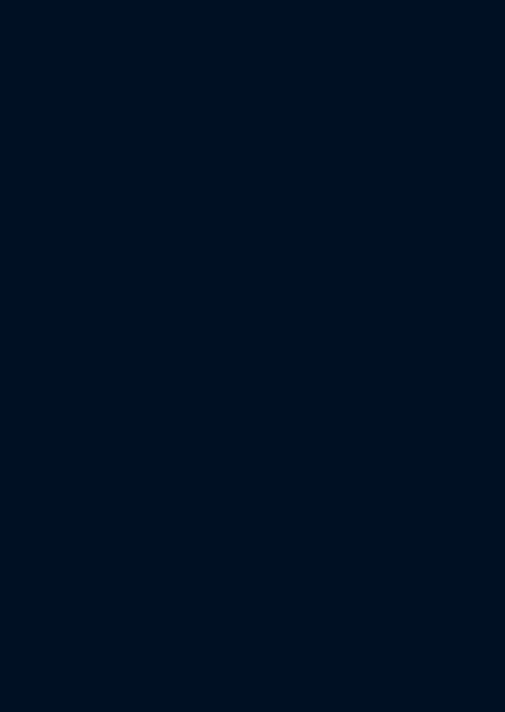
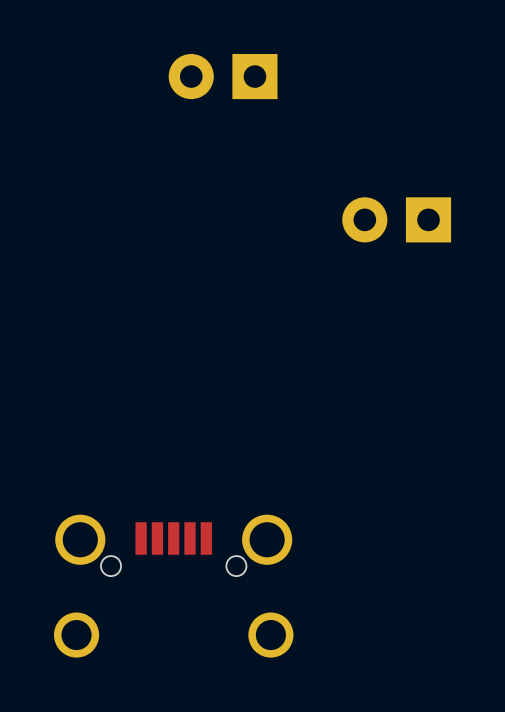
part: none -> (223, 76)
part: none -> (396, 219)
part: none -> (173, 586)

